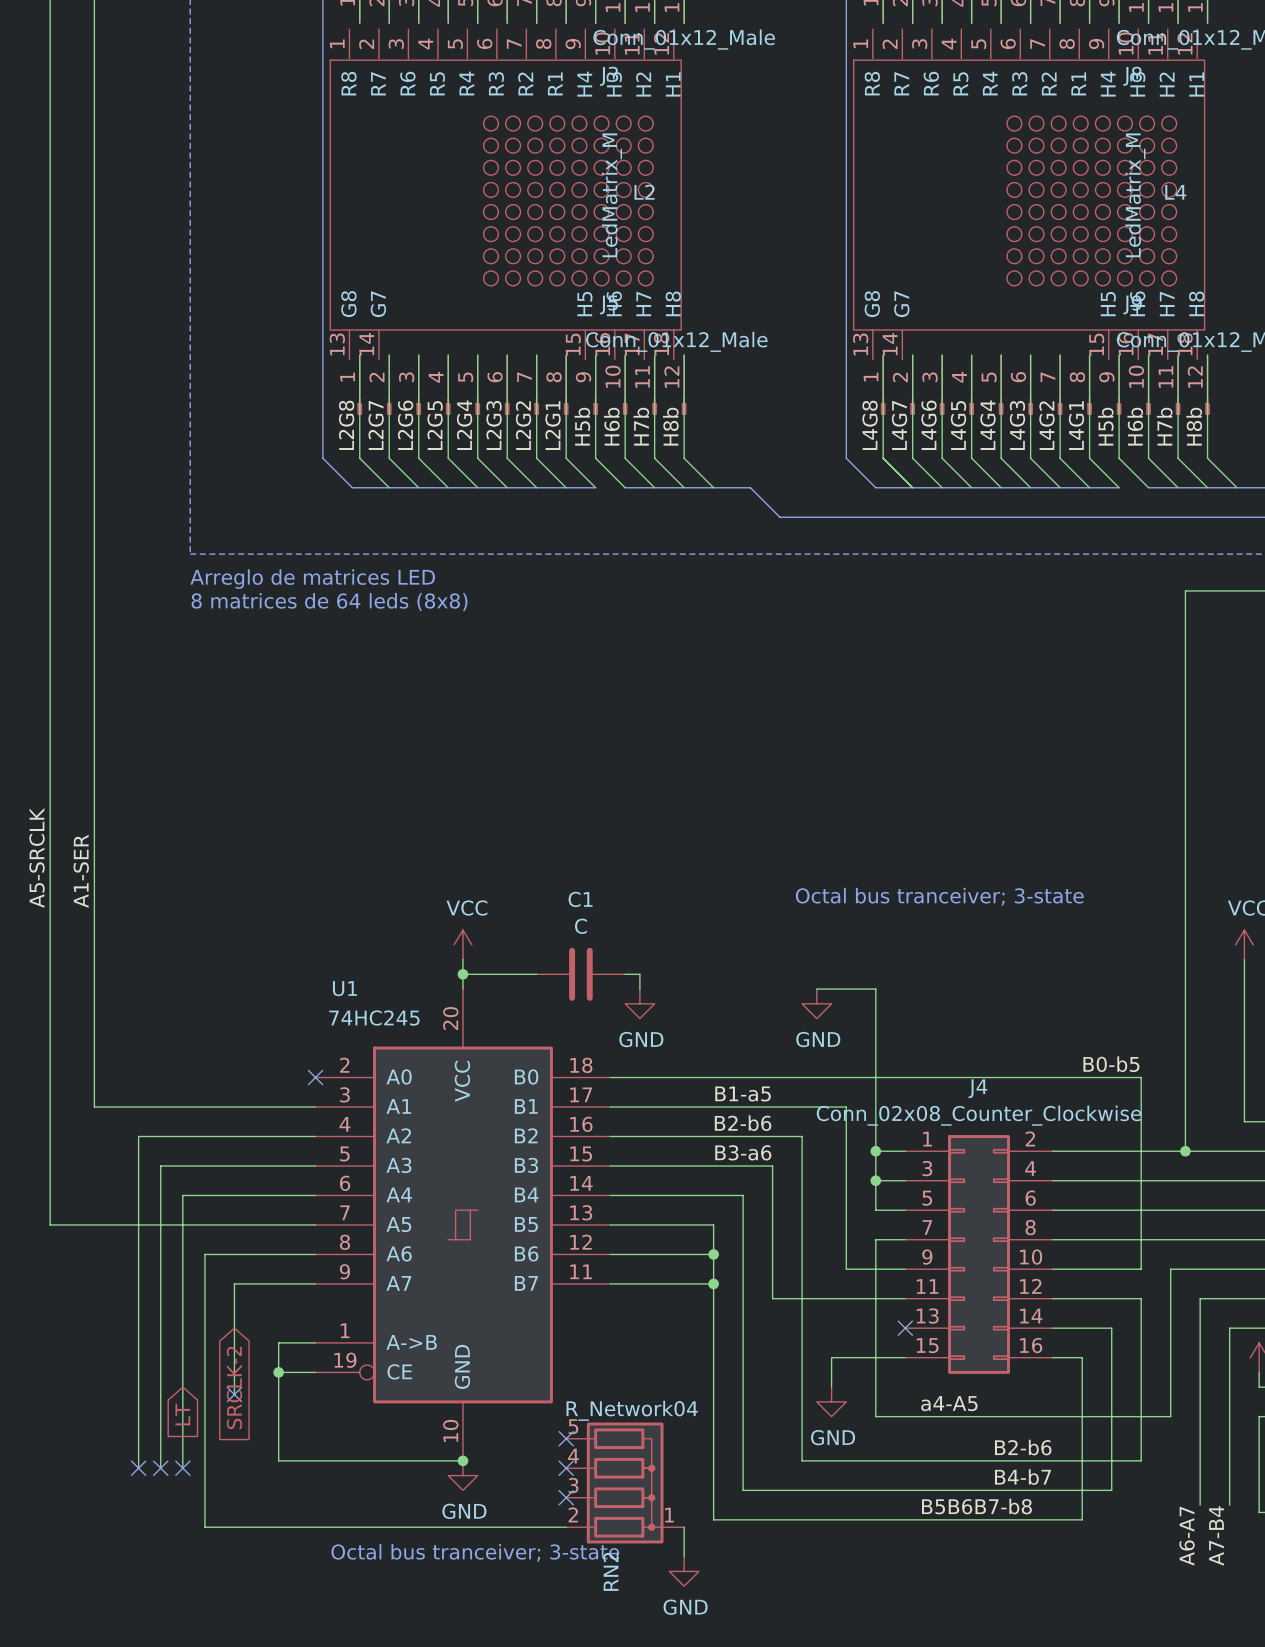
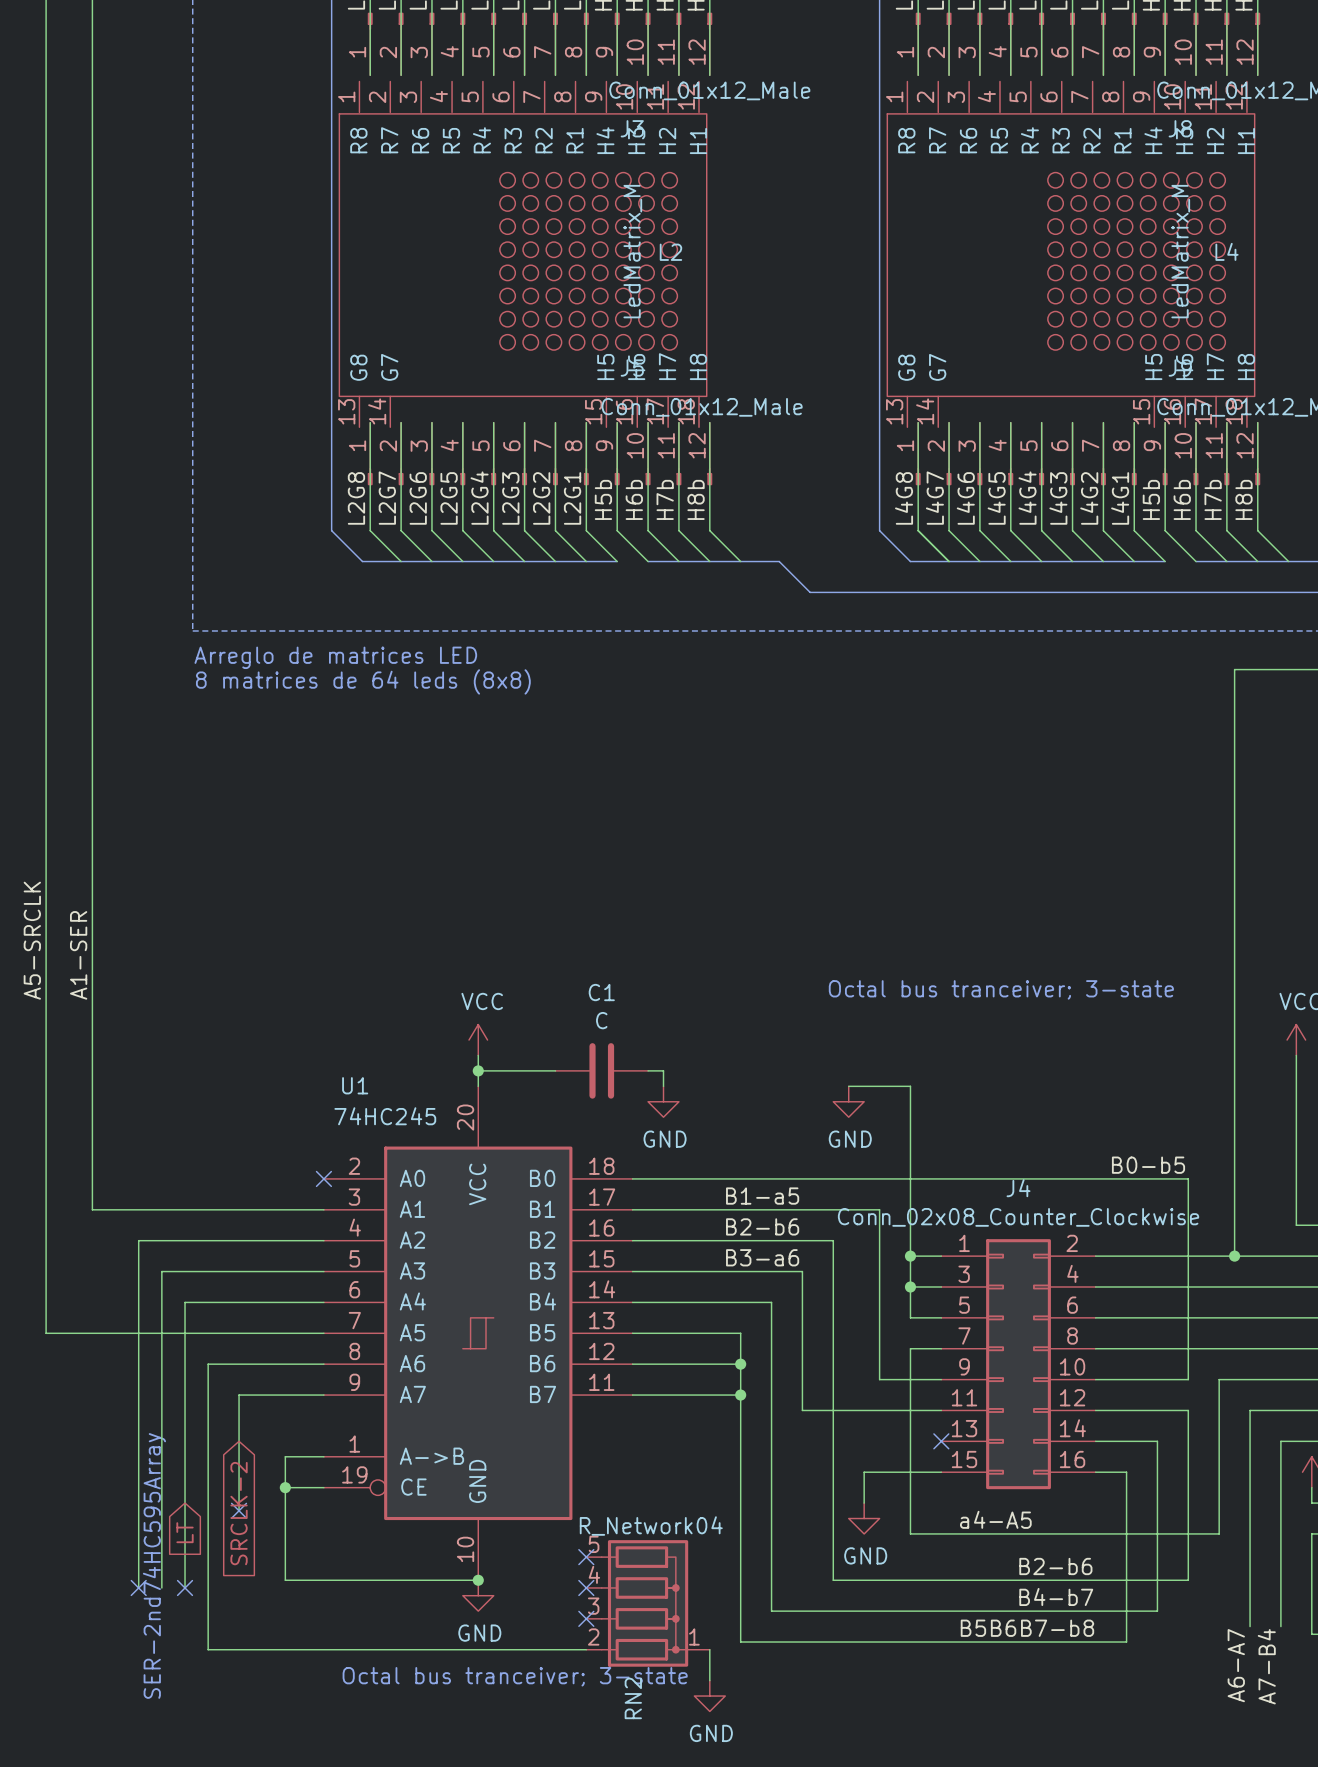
text: none -> SER-2nd74HC595Array (154, 1565)
no-connect mark: (160, 1468) -> none

